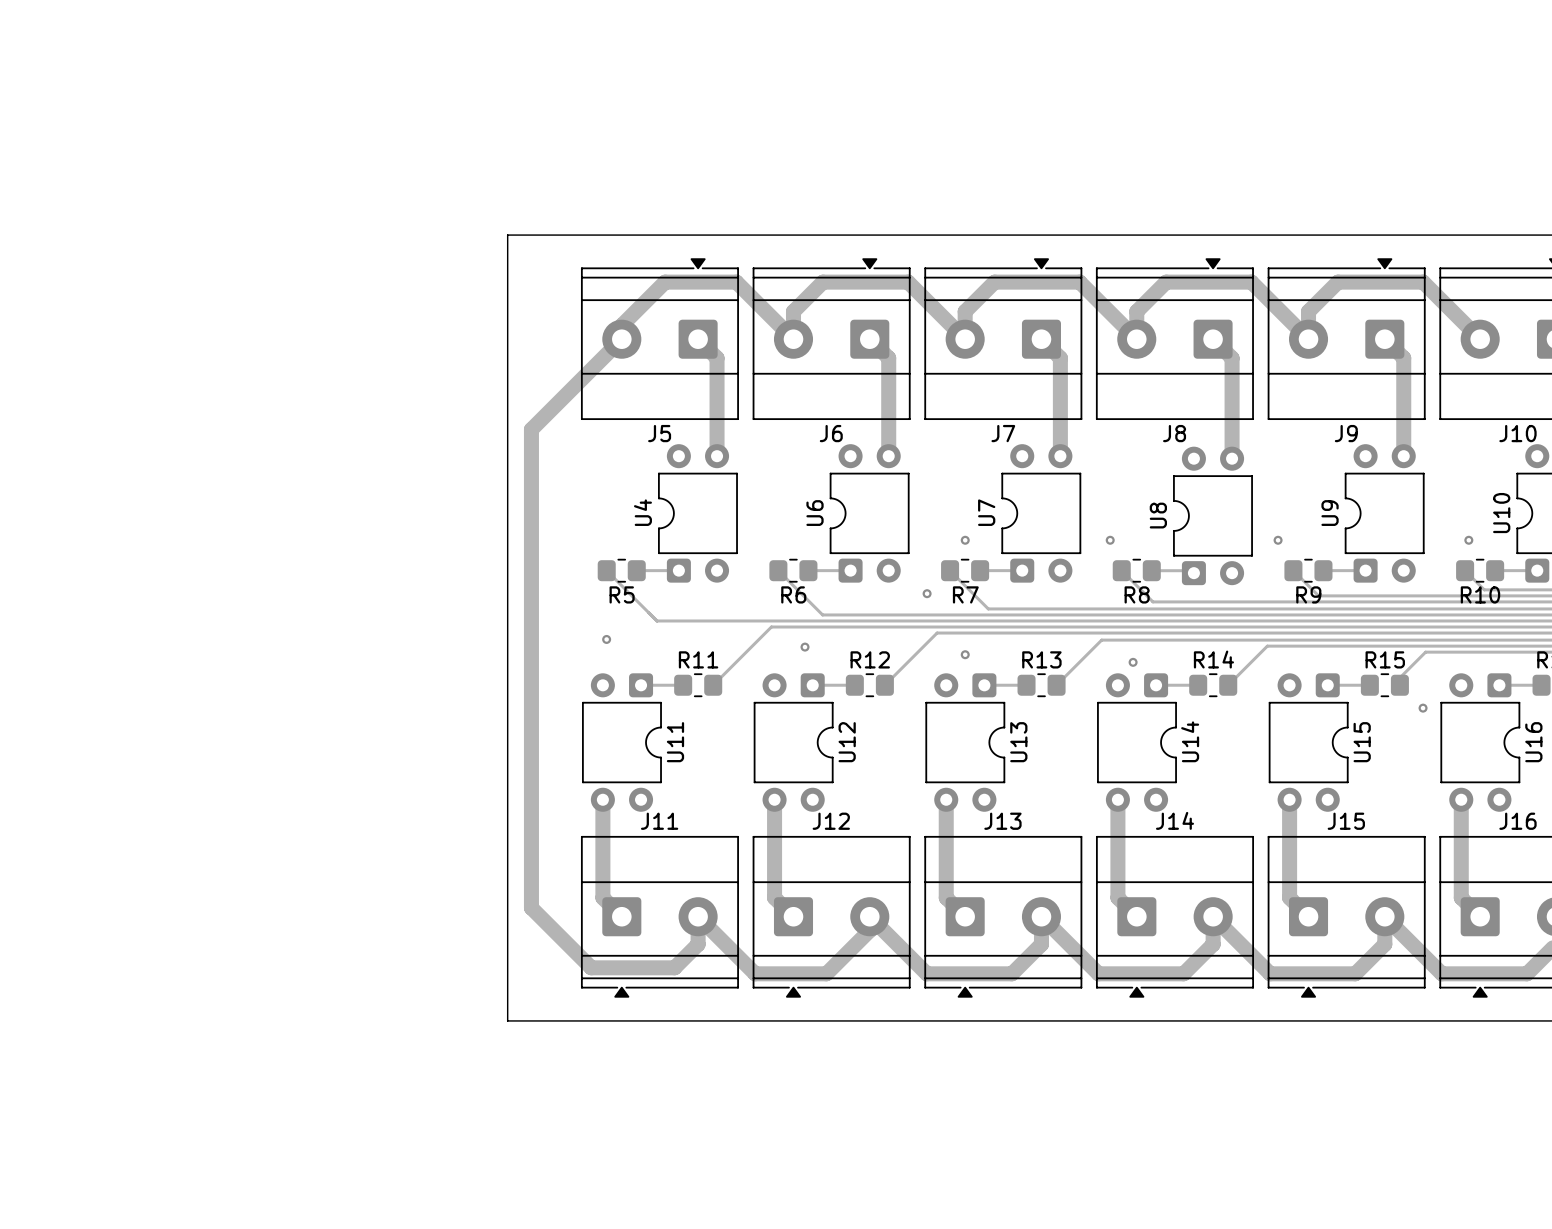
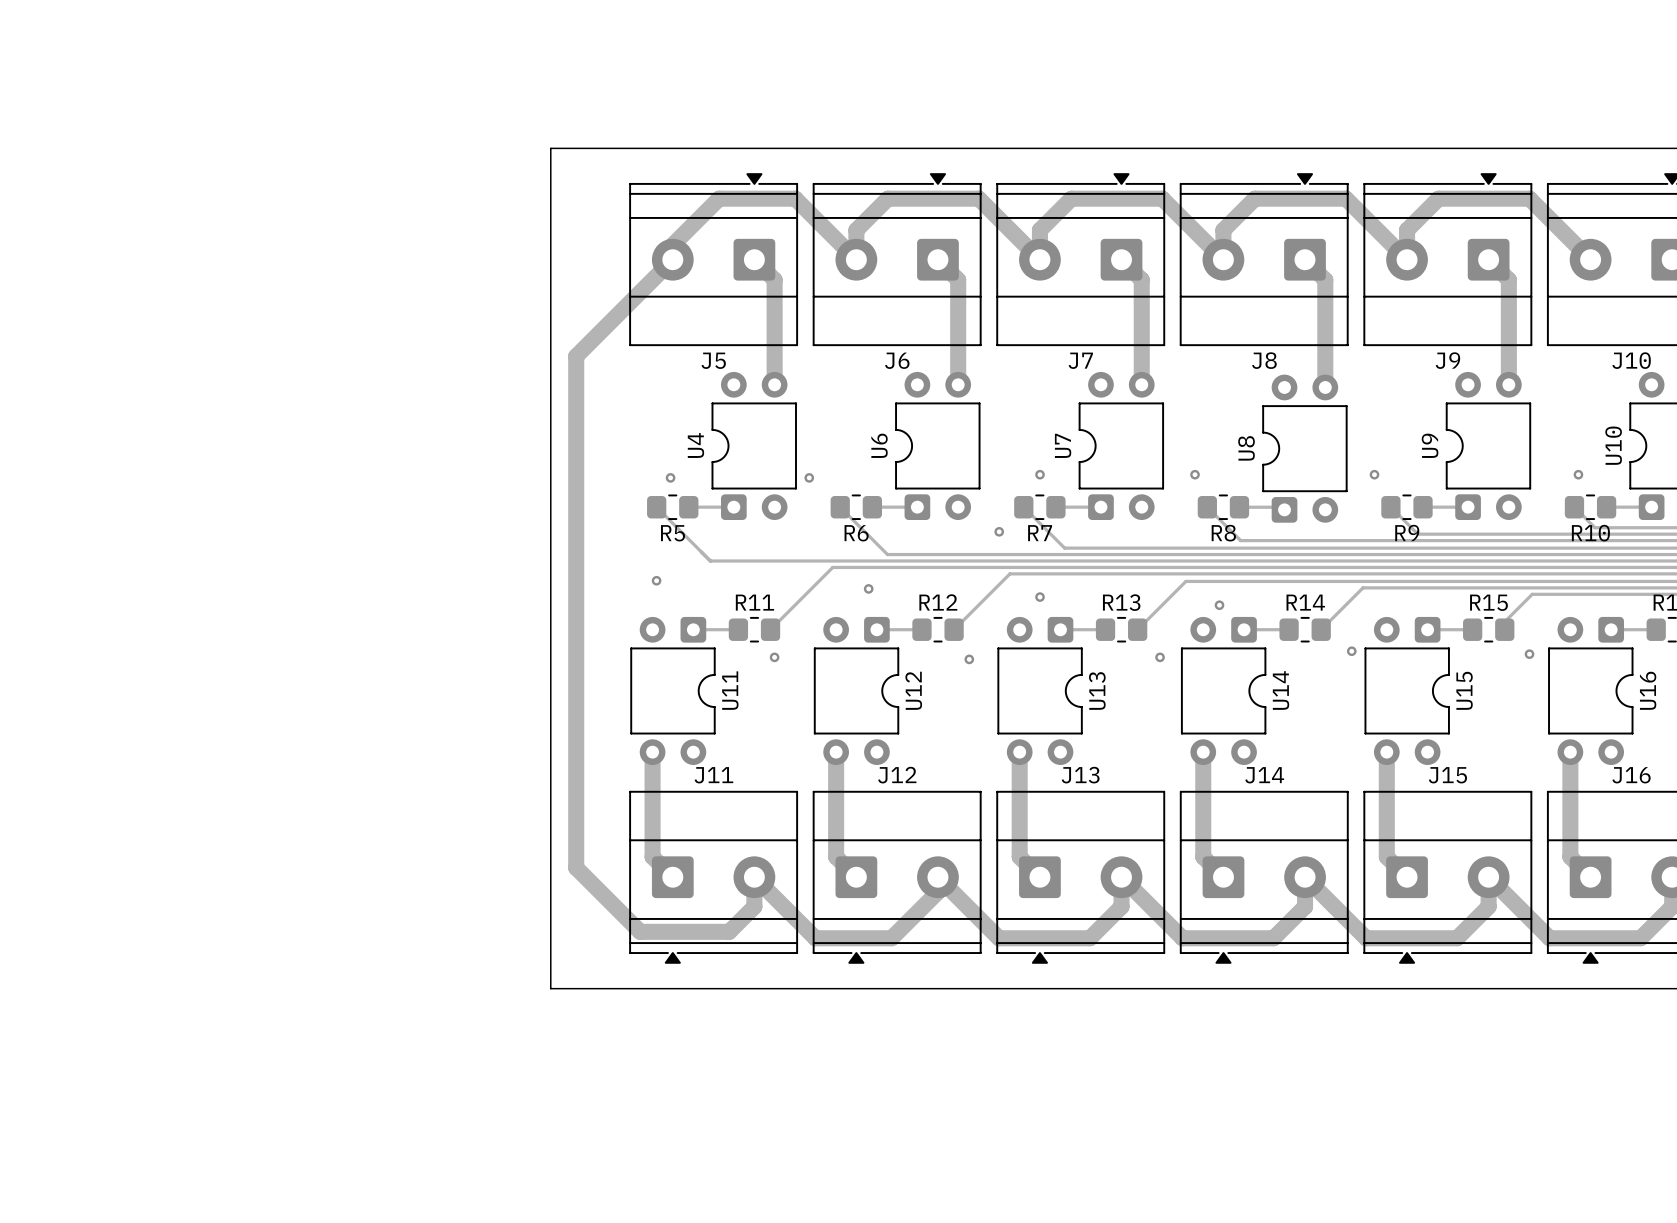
via: none -> (670, 477)
via: none -> (809, 477)
via: none -> (1351, 651)
via: none -> (774, 657)
via: none -> (1160, 657)
via: none -> (969, 659)

